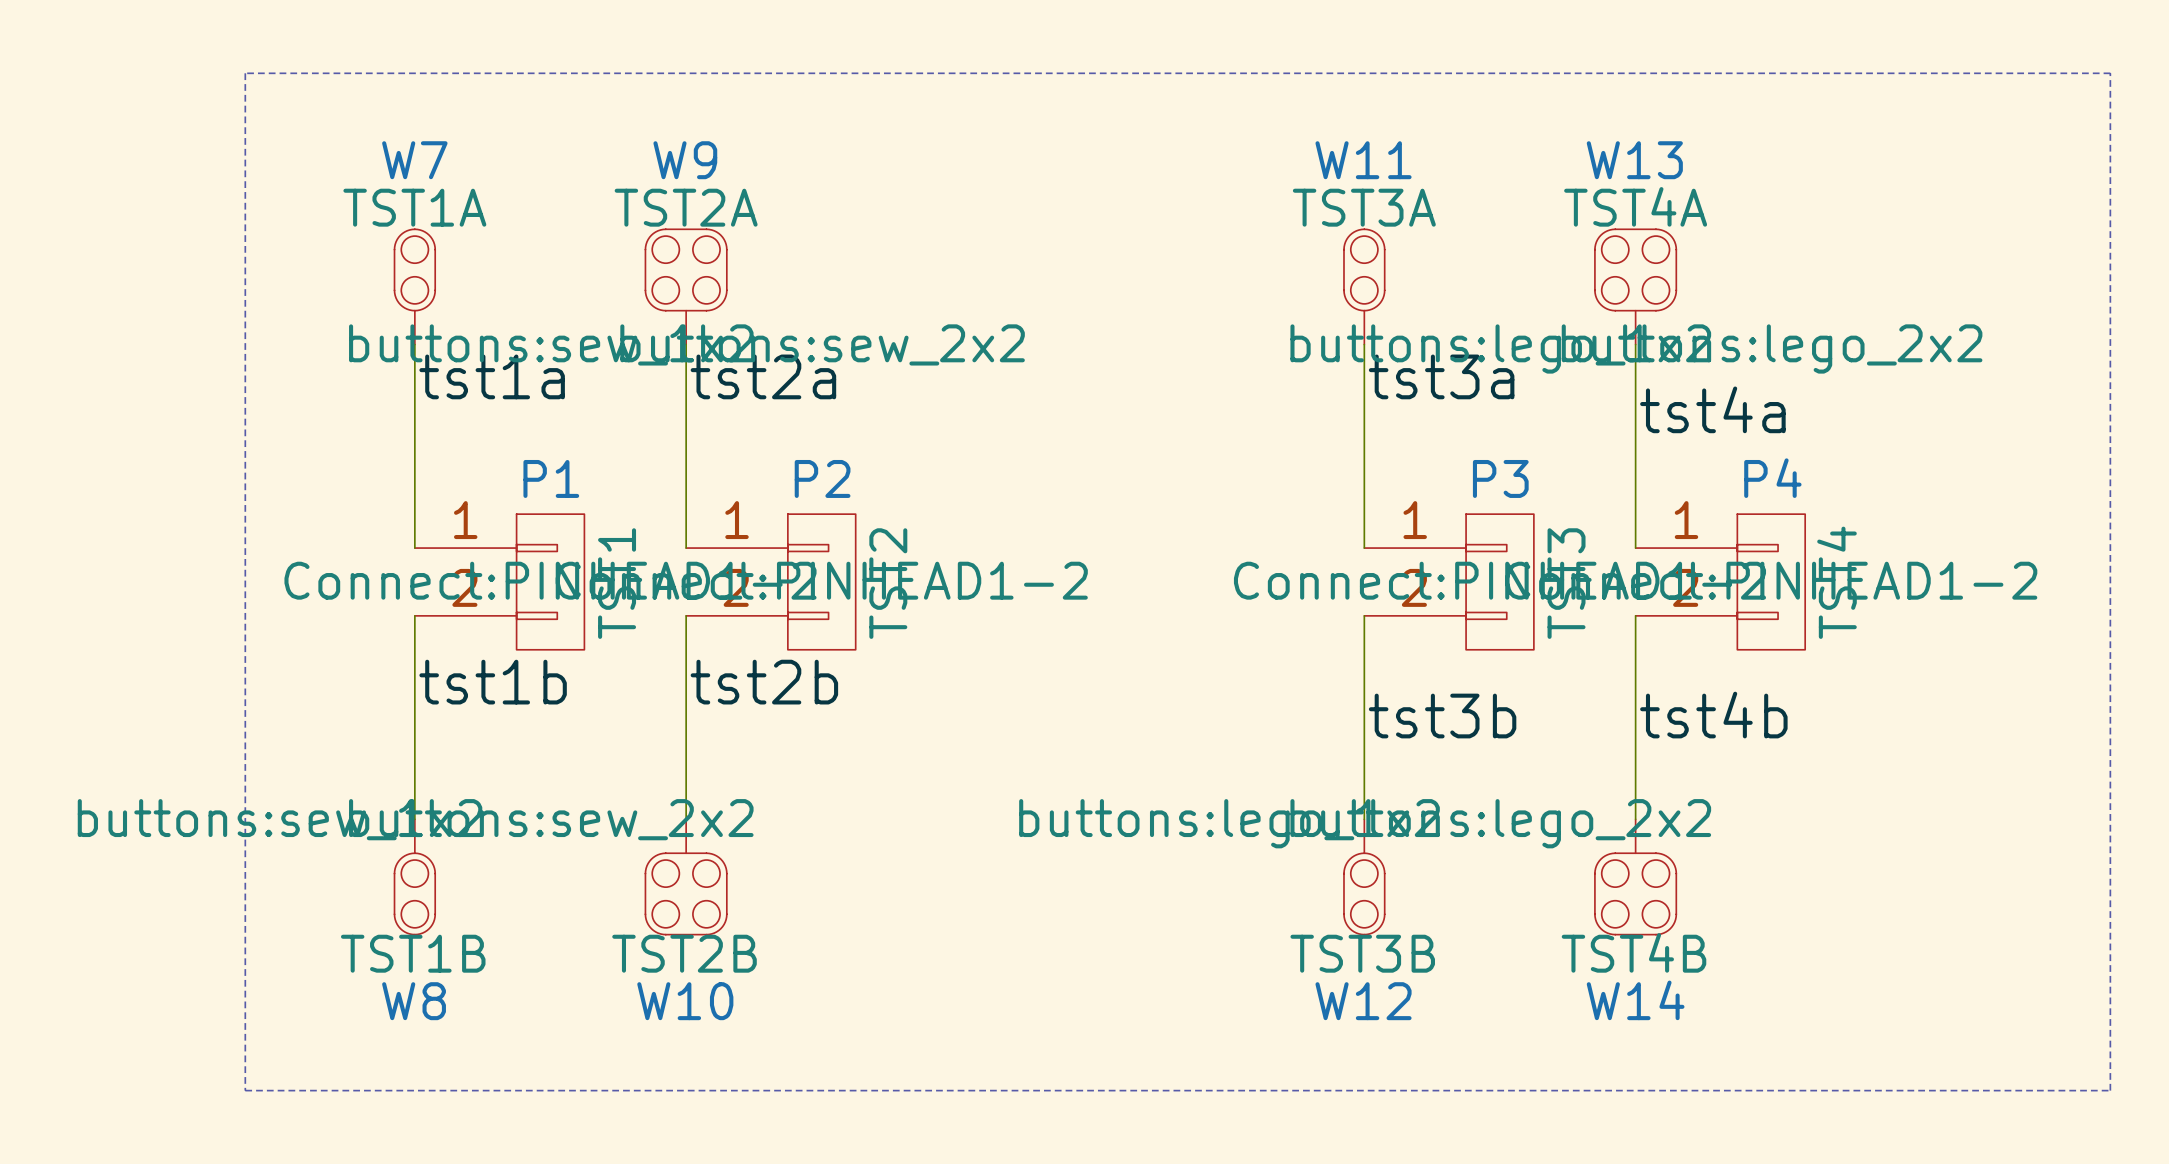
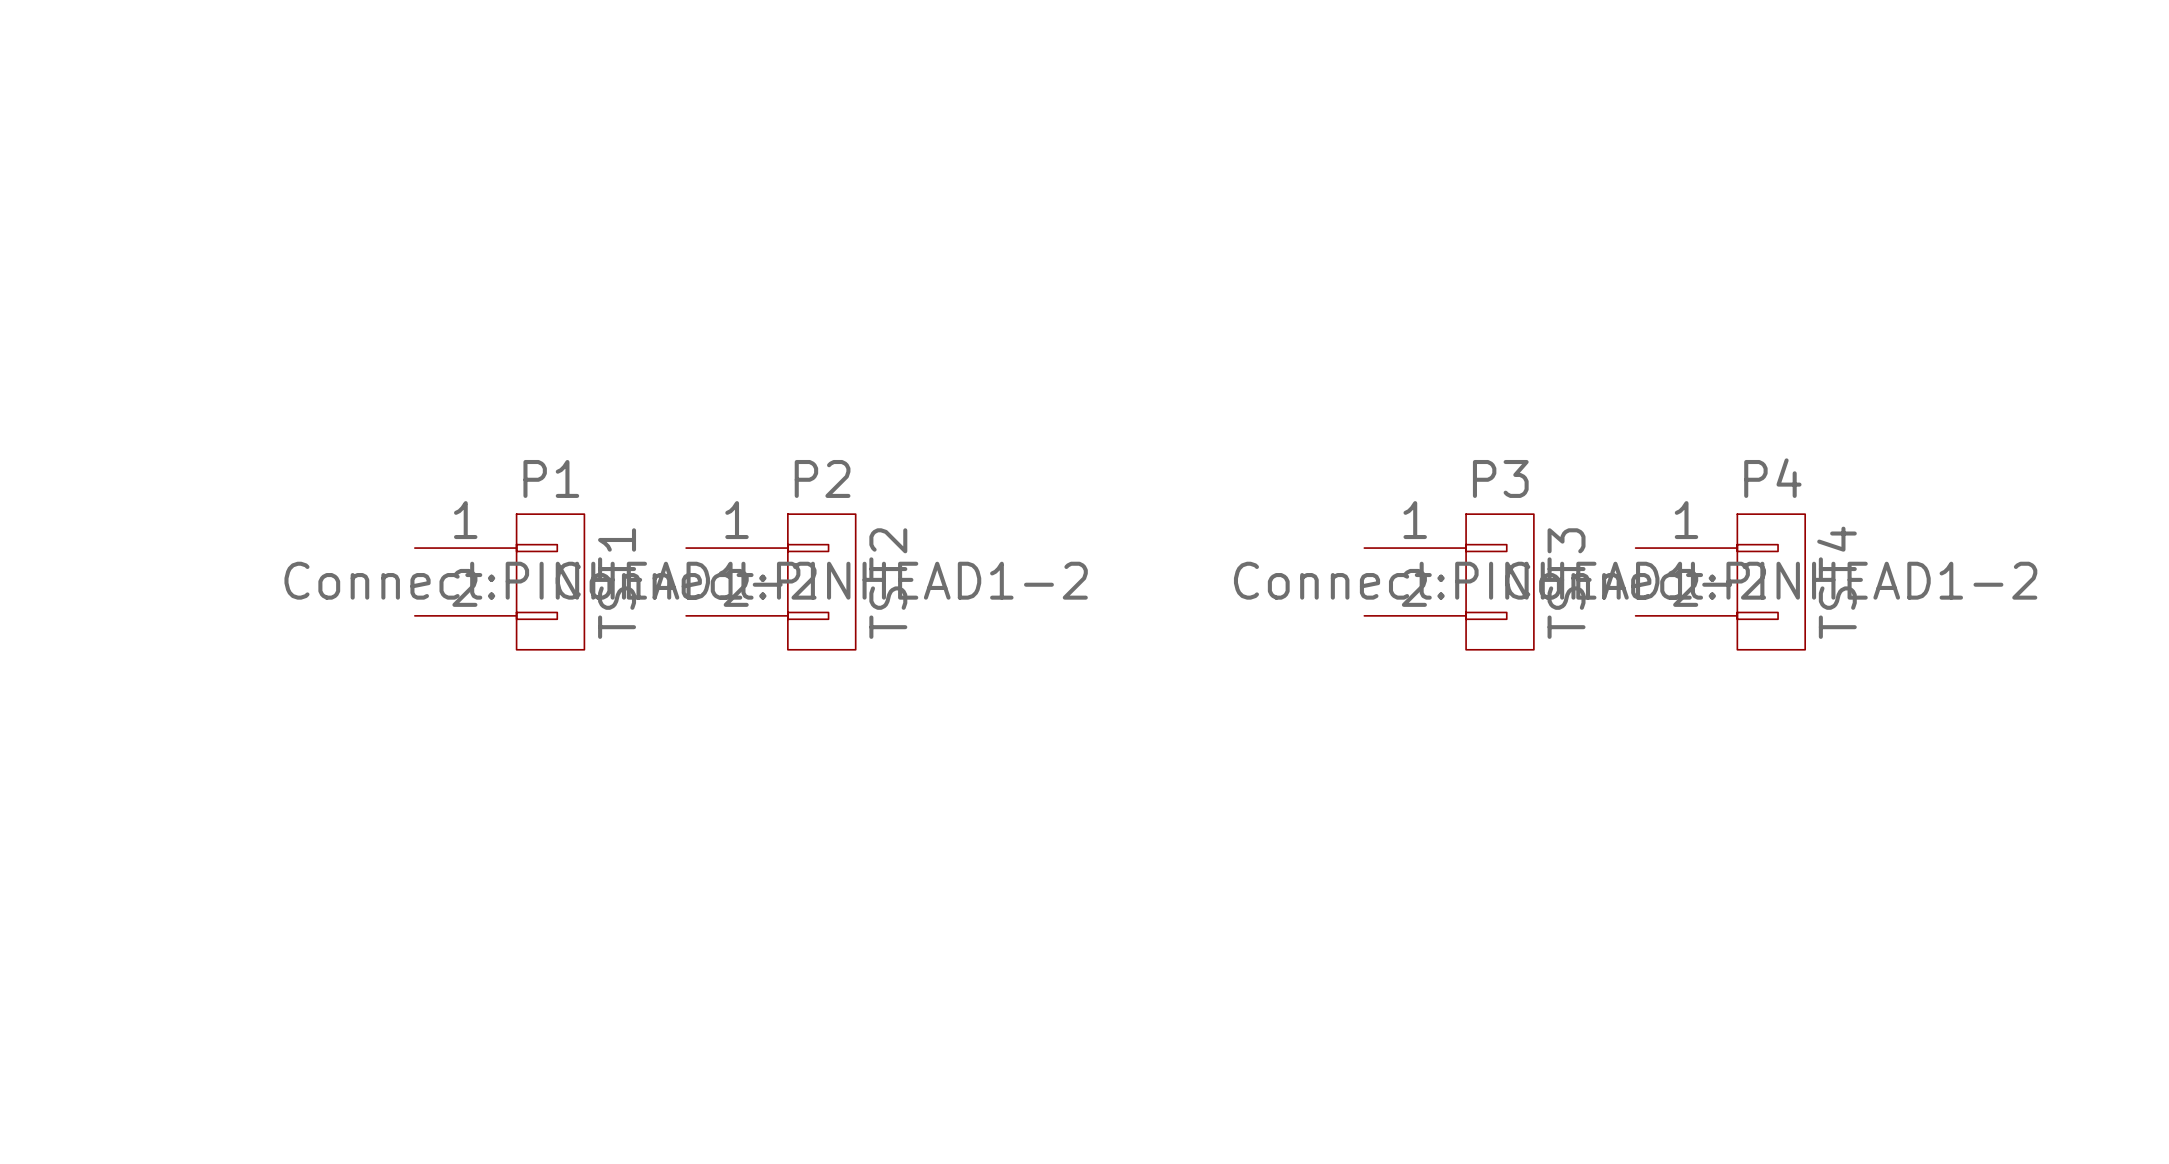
line: (245, 73) (2110, 73) (2110, 1090) (245, 1090) (245, 73) -> none
W7: TST1A (414, 286) -> none
W9: TST2A (686, 286) -> none
W11: TST3A (1364, 286) -> none
W13: TST4A (1635, 286) -> none
wire: (414, 344) (414, 548) -> none
wire: (686, 344) (686, 548) -> none
wire: (1364, 344) (1364, 548) -> none
wire: (1635, 344) (1635, 548) -> none
label: tst1a (492, 376) -> none
label: tst2a (763, 376) -> none
label: tst3a (1441, 376) -> none
label: tst4a (1712, 409) -> none
wire: (414, 615) (414, 819) -> none
wire: (686, 615) (686, 819) -> none
wire: (1364, 615) (1364, 819) -> none
wire: (1635, 615) (1635, 819) -> none
label: tst1b (493, 682) -> none
label: tst2b (764, 682) -> none
label: tst4b (1713, 715) -> none
label: tst3b (1442, 716) -> none
W8: TST1B (414, 876) -> none
W10: TST2B (686, 876) -> none
W12: TST3B (1364, 876) -> none
W14: TST4B (1635, 876) -> none

